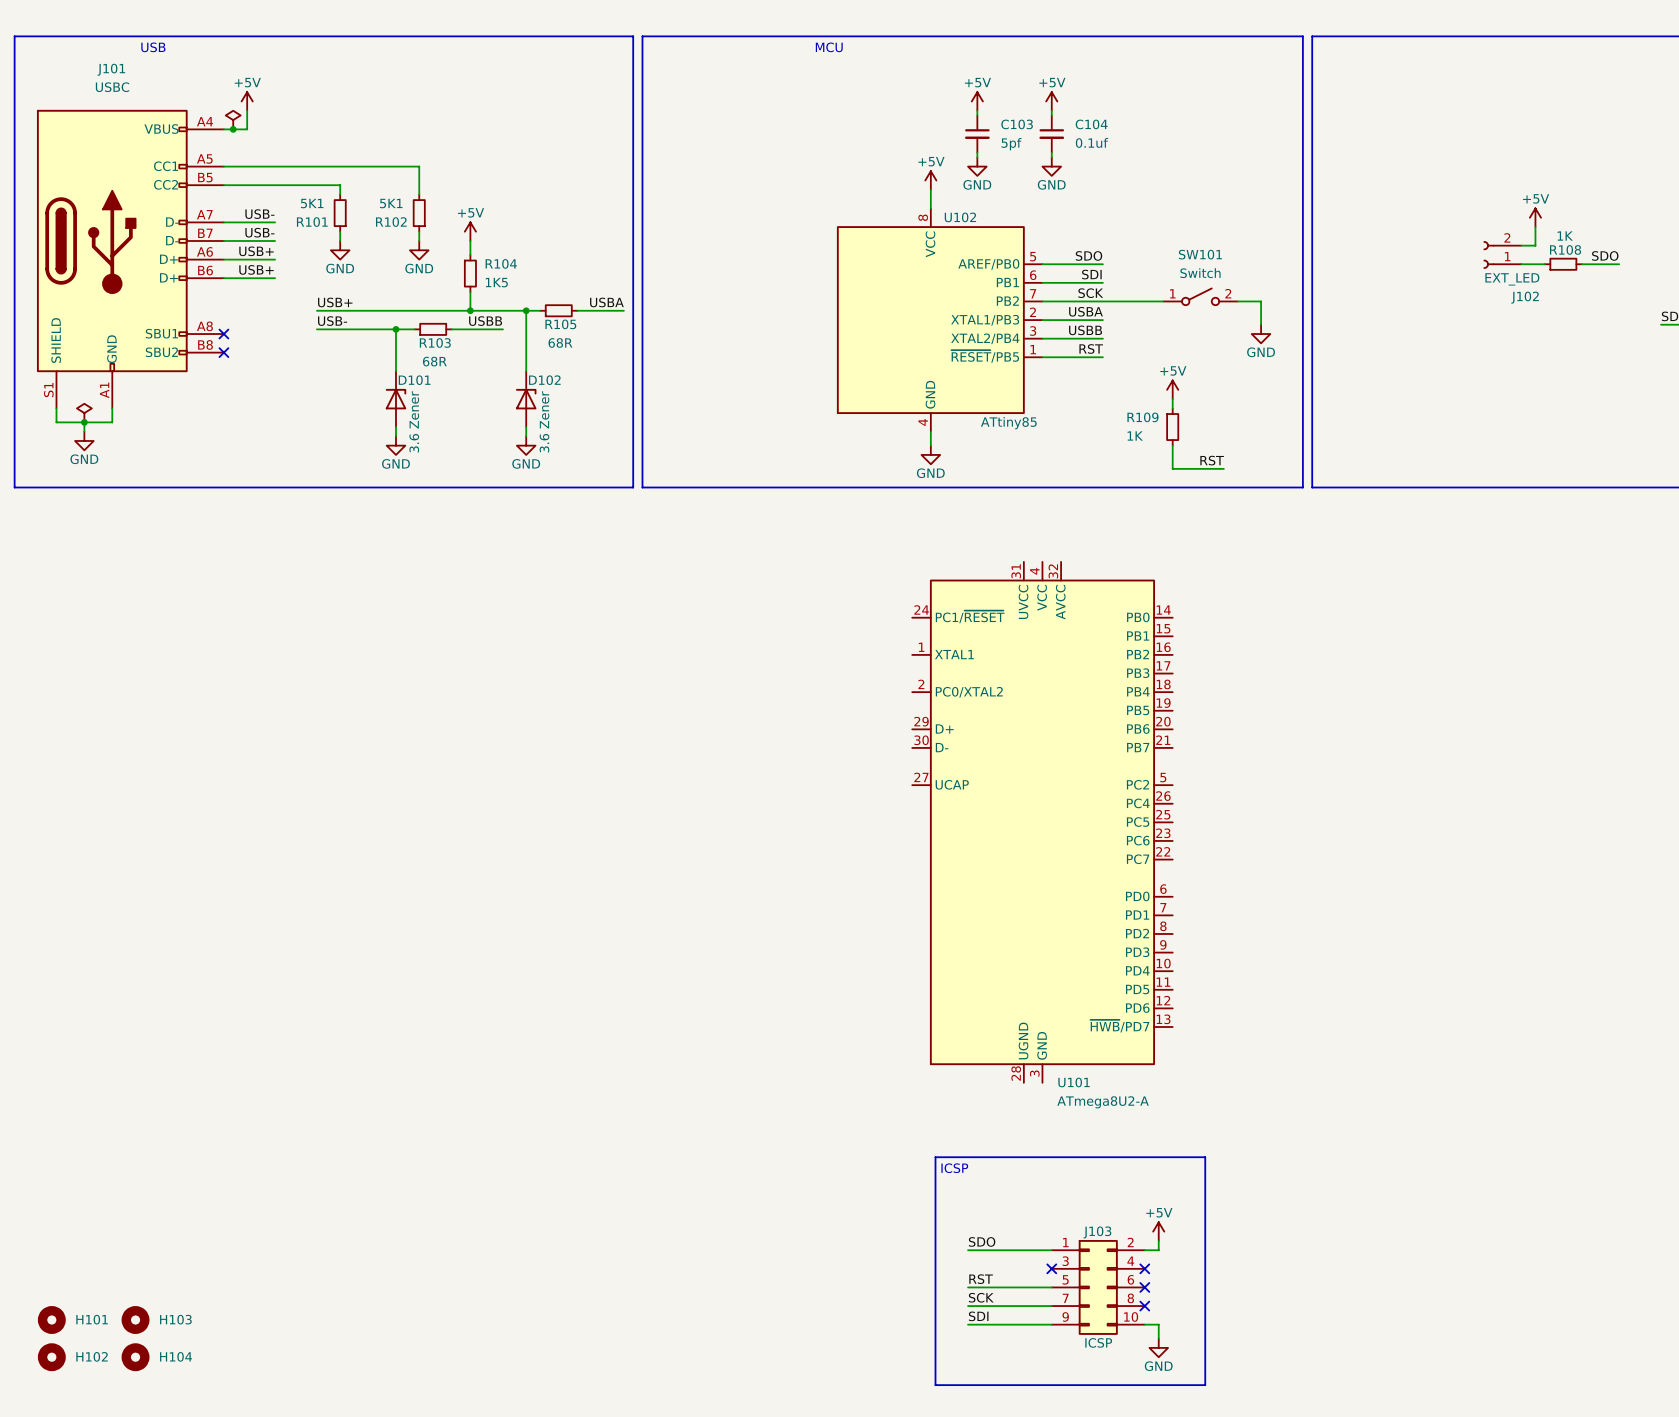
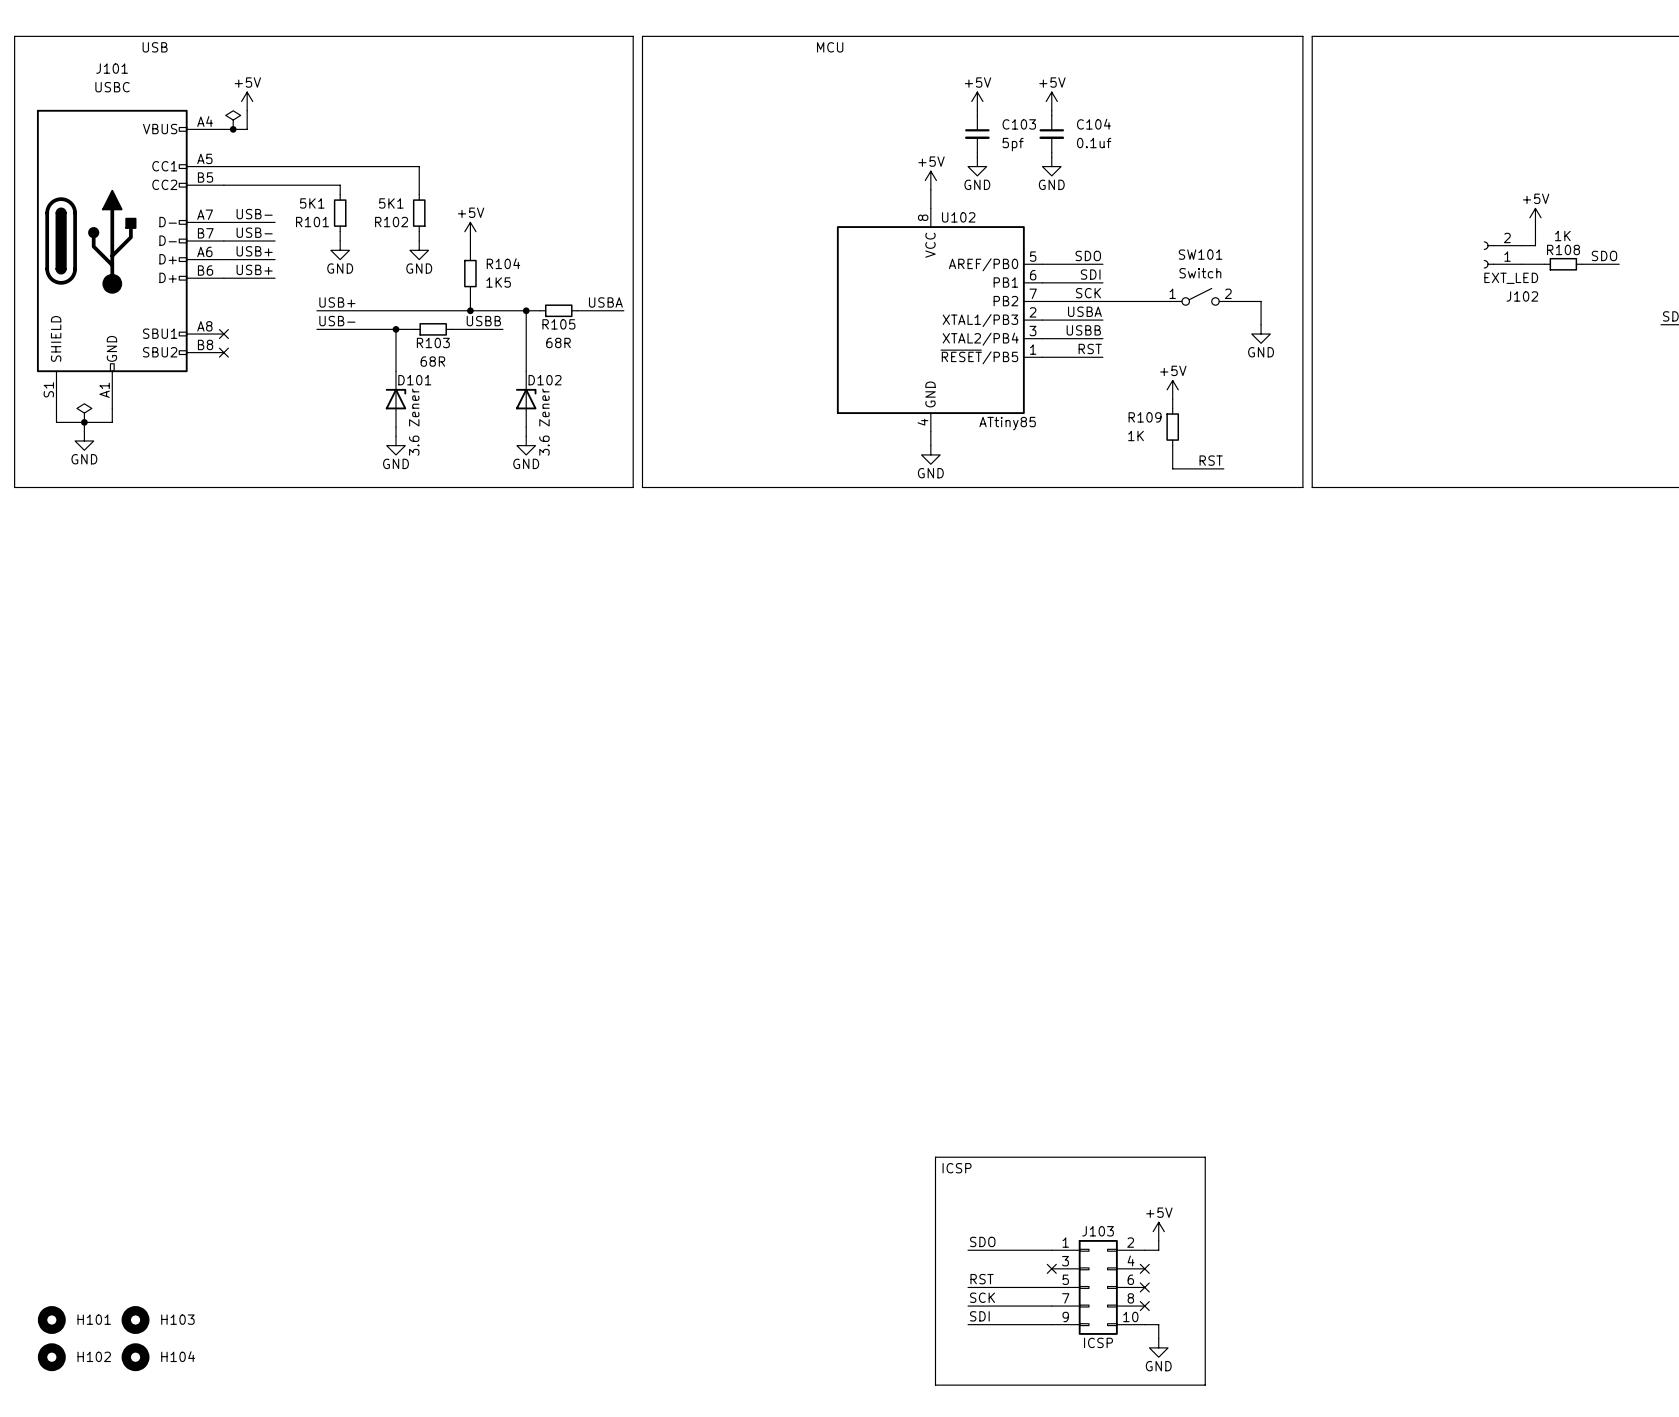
U101: ATmega8U2-A (1042, 822) -> none

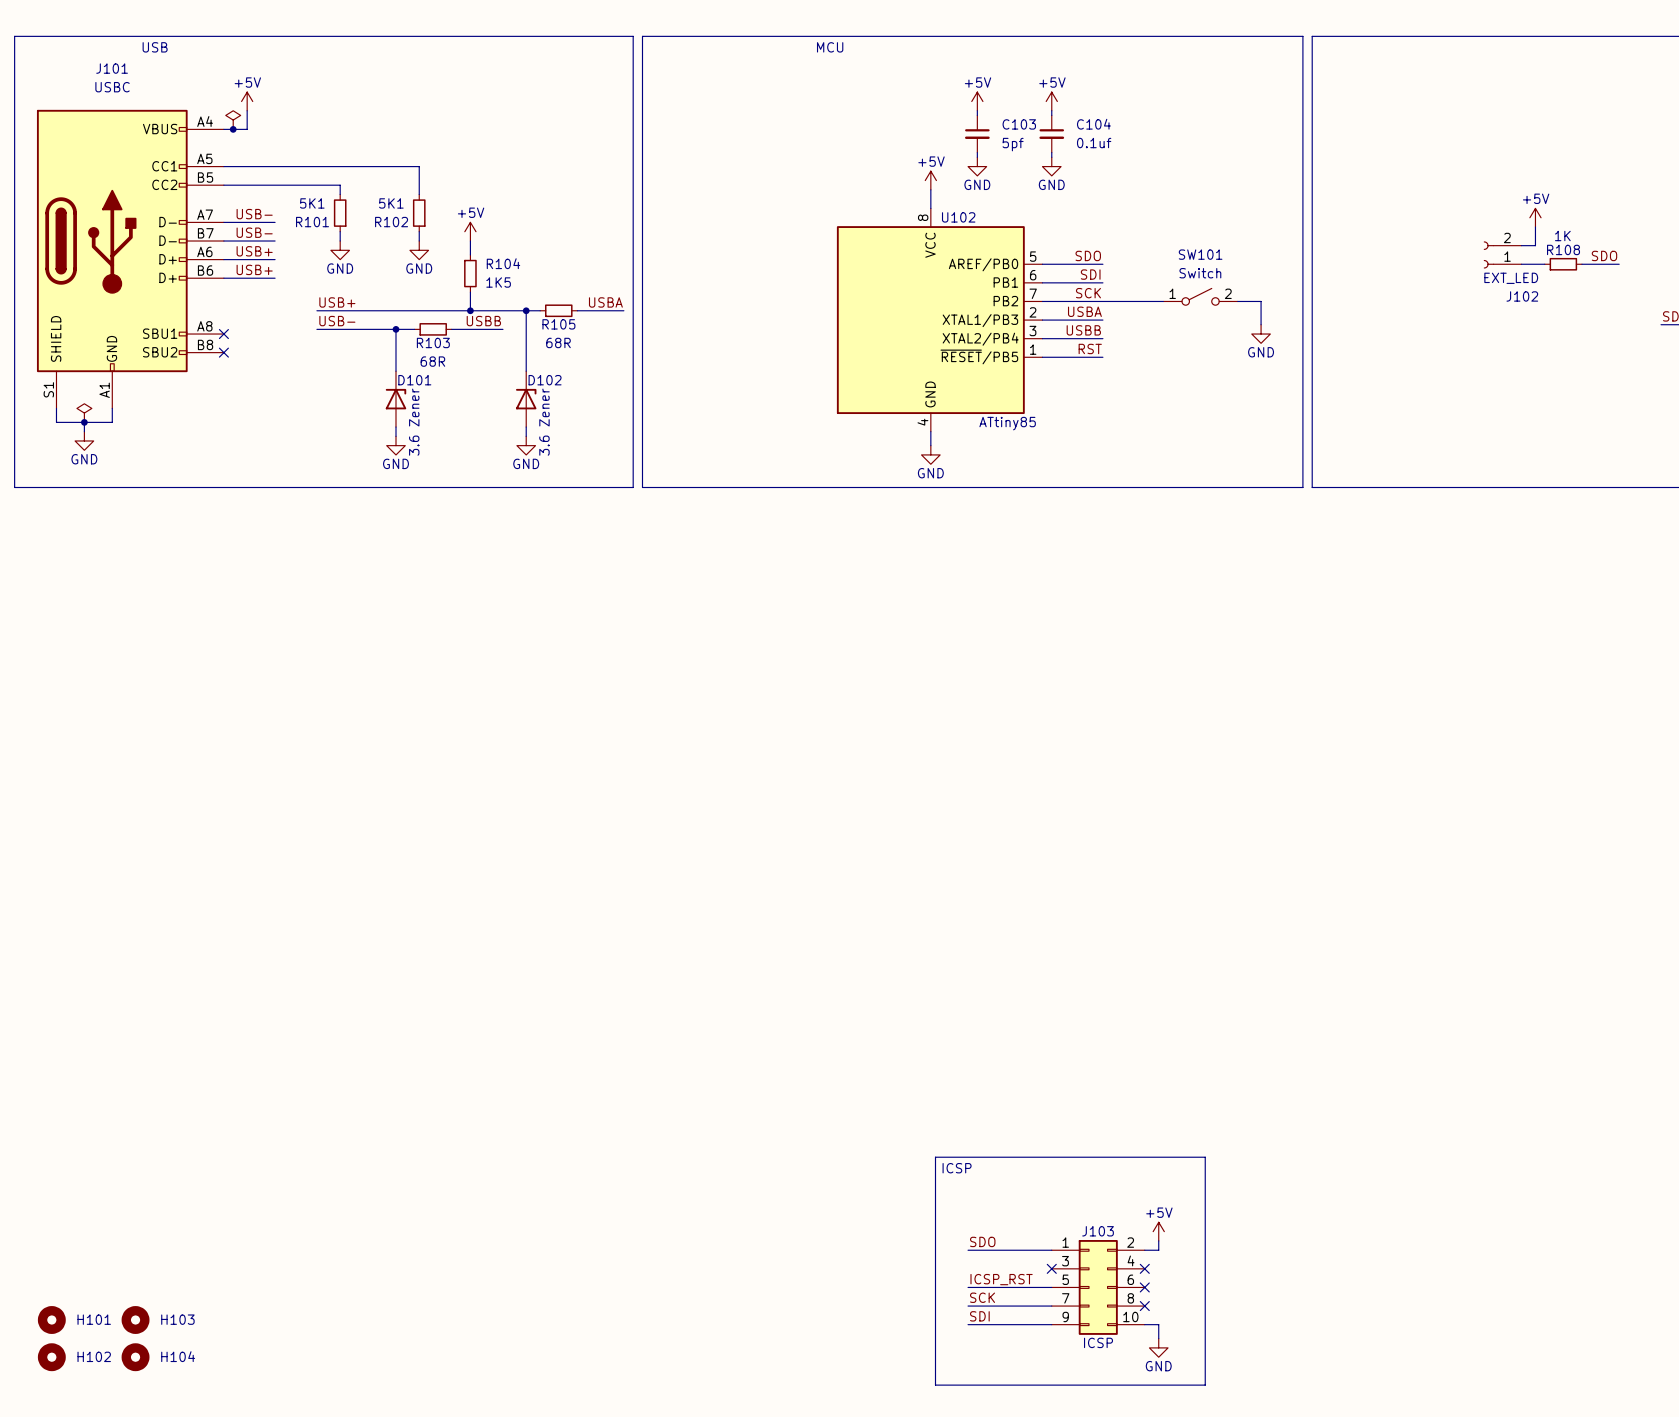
power symbol: +5V (1172, 389) -> none
wire: (1172, 399) (1172, 408) -> none
R109: 1K (1172, 427) -> none
wire: (1172, 445) (1172, 468) (1223, 468) -> none
label: RST (1211, 460) -> none
label: RST (982, 1279) -> ICSP_RST (1001, 1279)

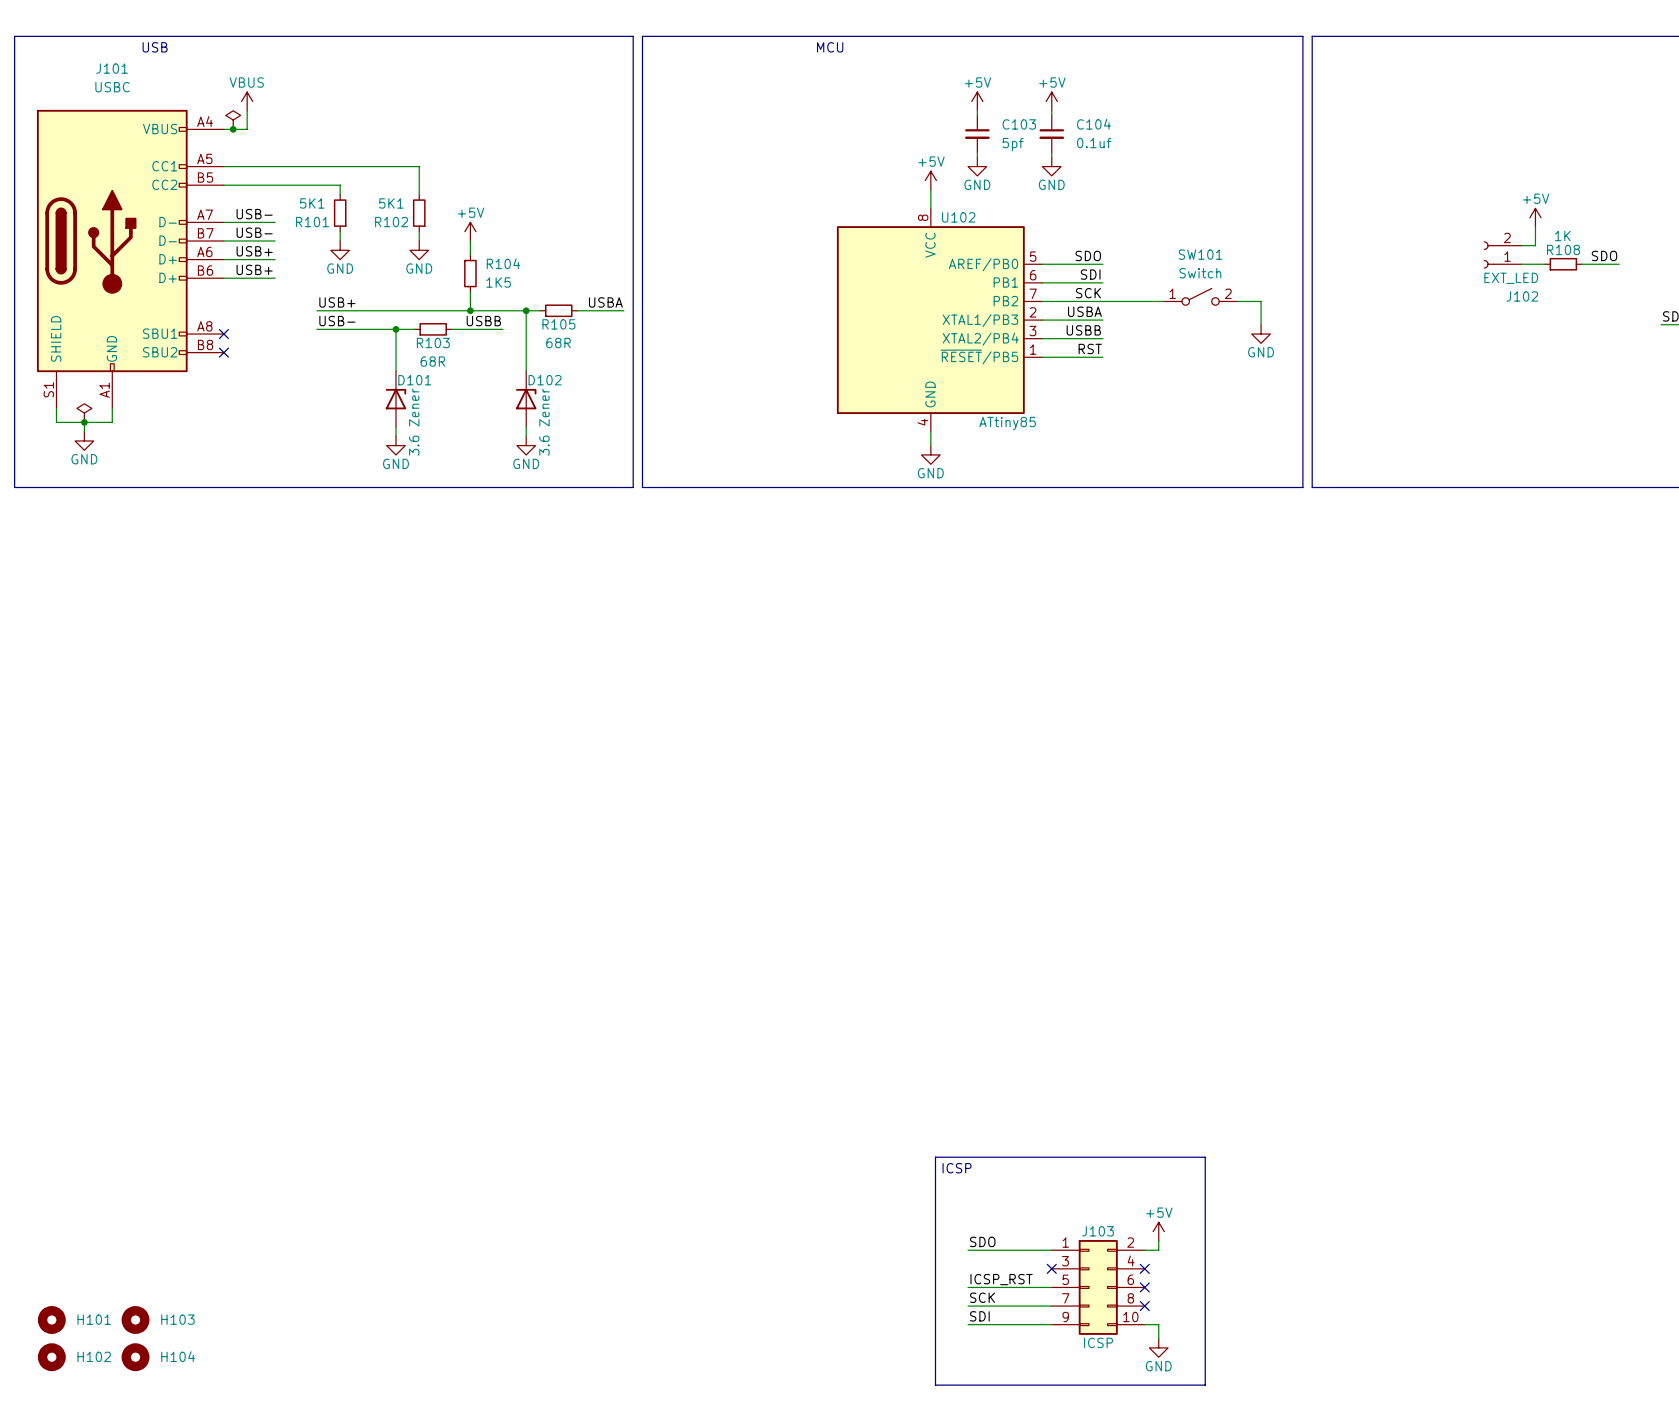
power symbol: +5V (247, 101) -> VBUS (247, 101)

